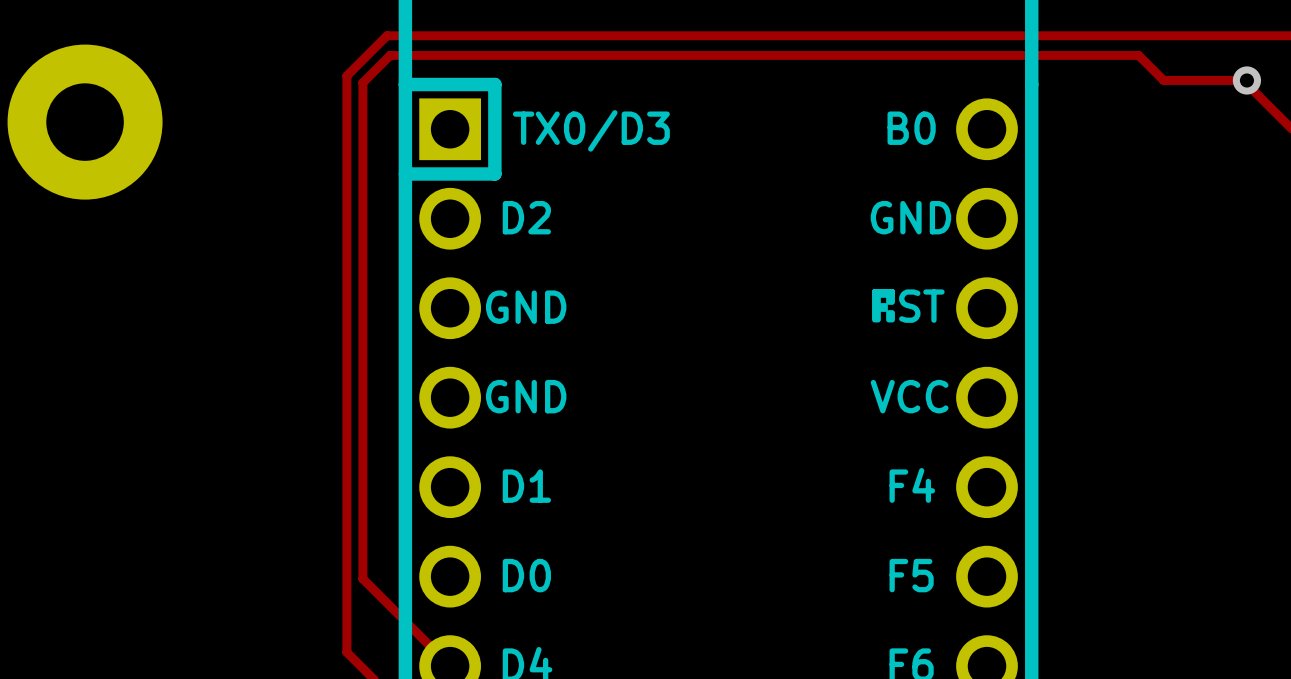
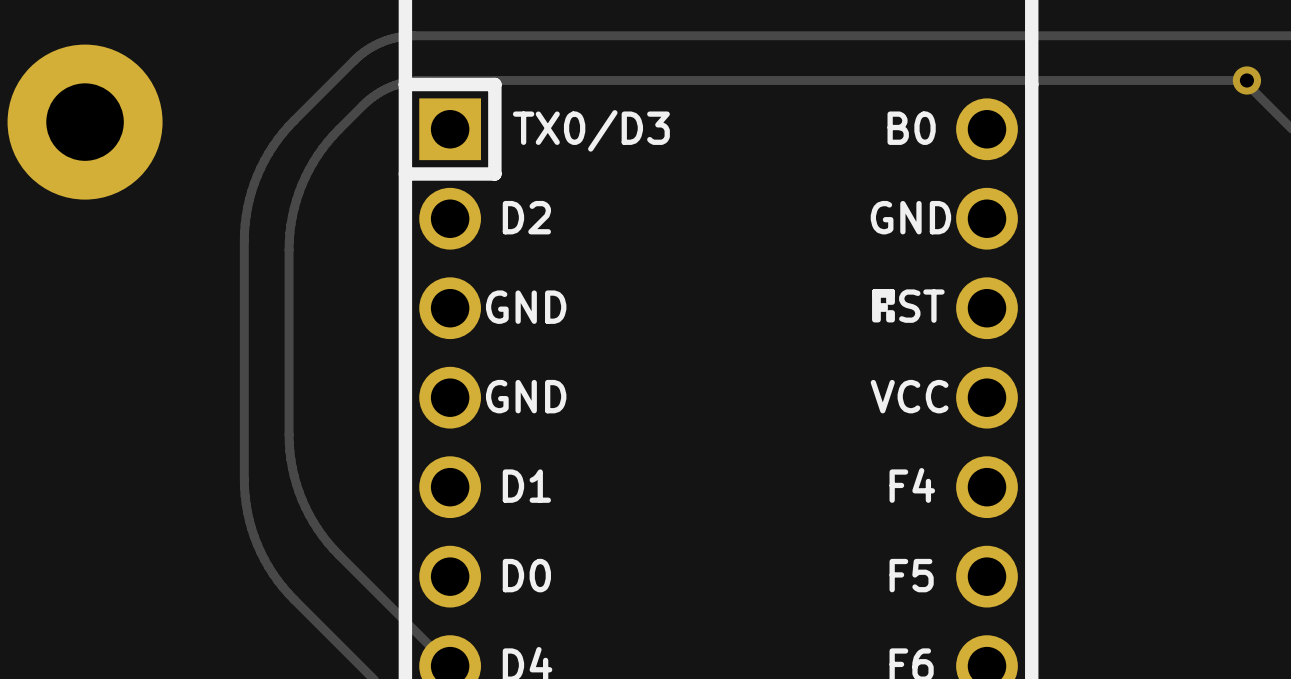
track: (414, 35) (387, 35) (346, 75) (346, 652) -> (414, 35) (389, 39) (363, 52) (288, 126) (268, 153) (257, 175) (249, 199) (245, 224) (244, 479) (249, 520) (260, 552) (277, 580) (346, 652)
track: (1163, 80) (1138, 55) (390, 55) (362, 82) (362, 578) -> (1163, 80) (423, 80) (398, 84) (379, 92) (366, 102) (333, 135) (313, 162) (296, 200) (289, 241) (289, 434) (292, 467) (302, 499) (317, 529) (333, 548) (362, 578)

